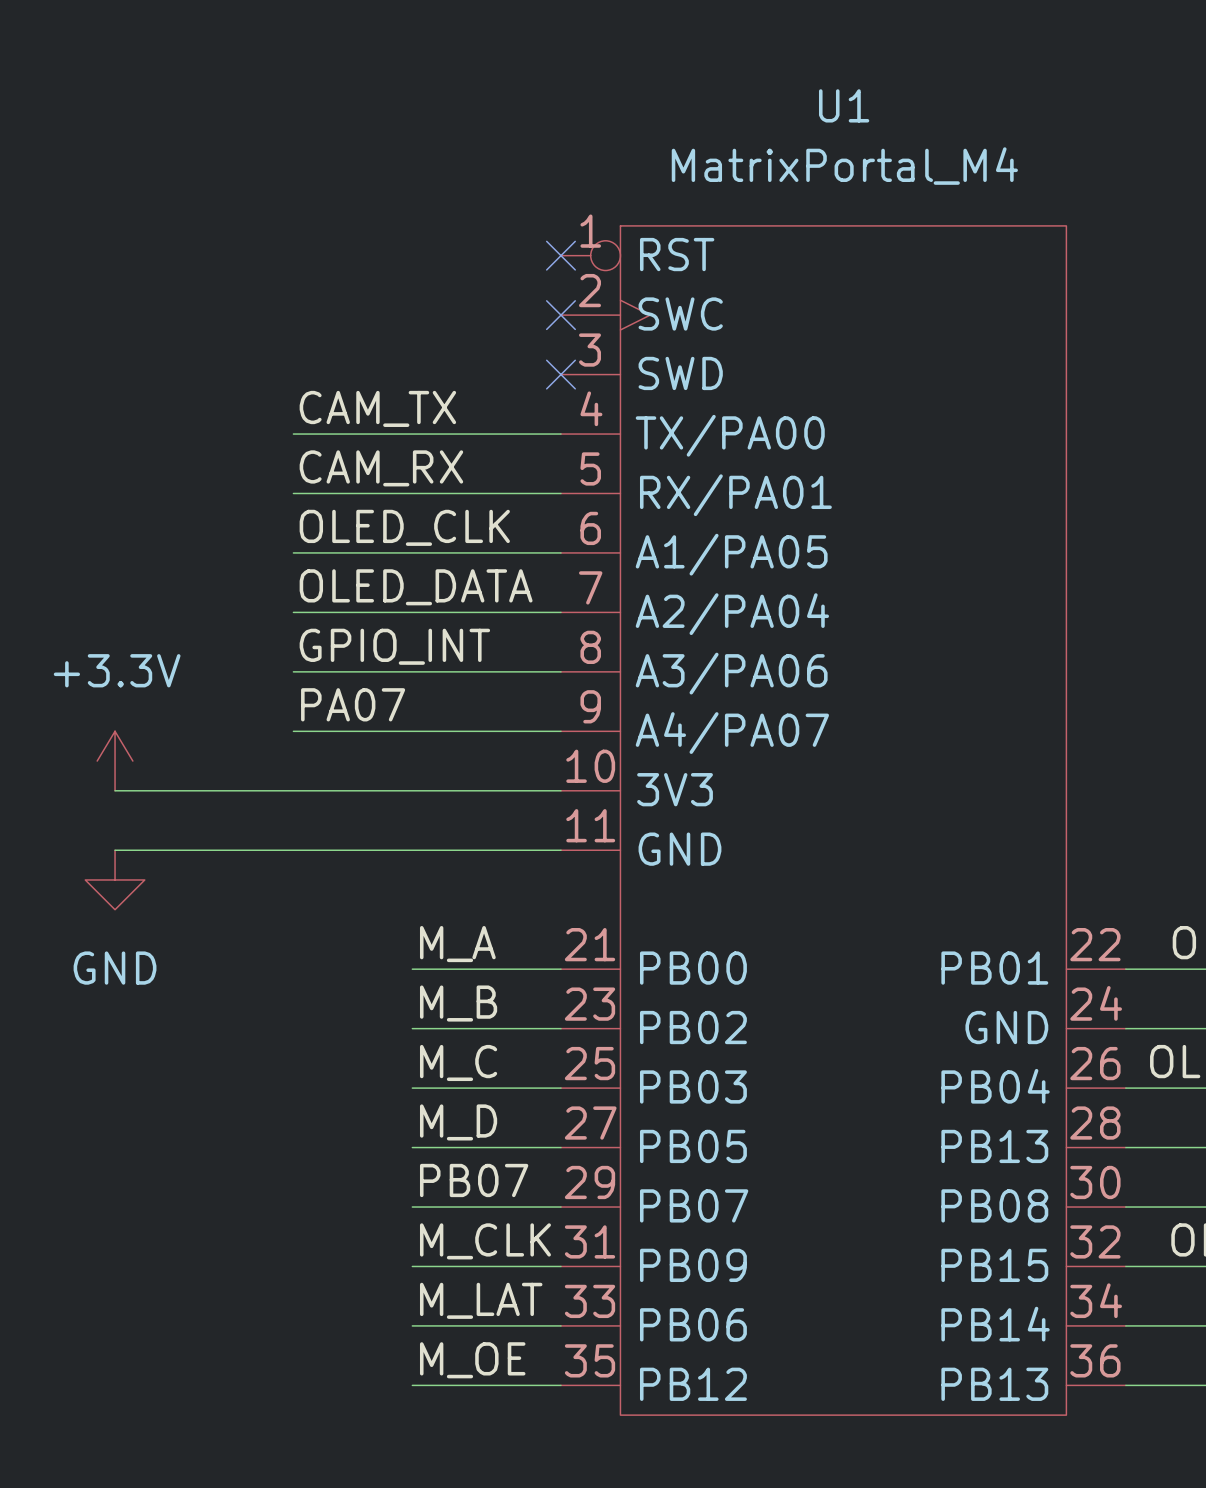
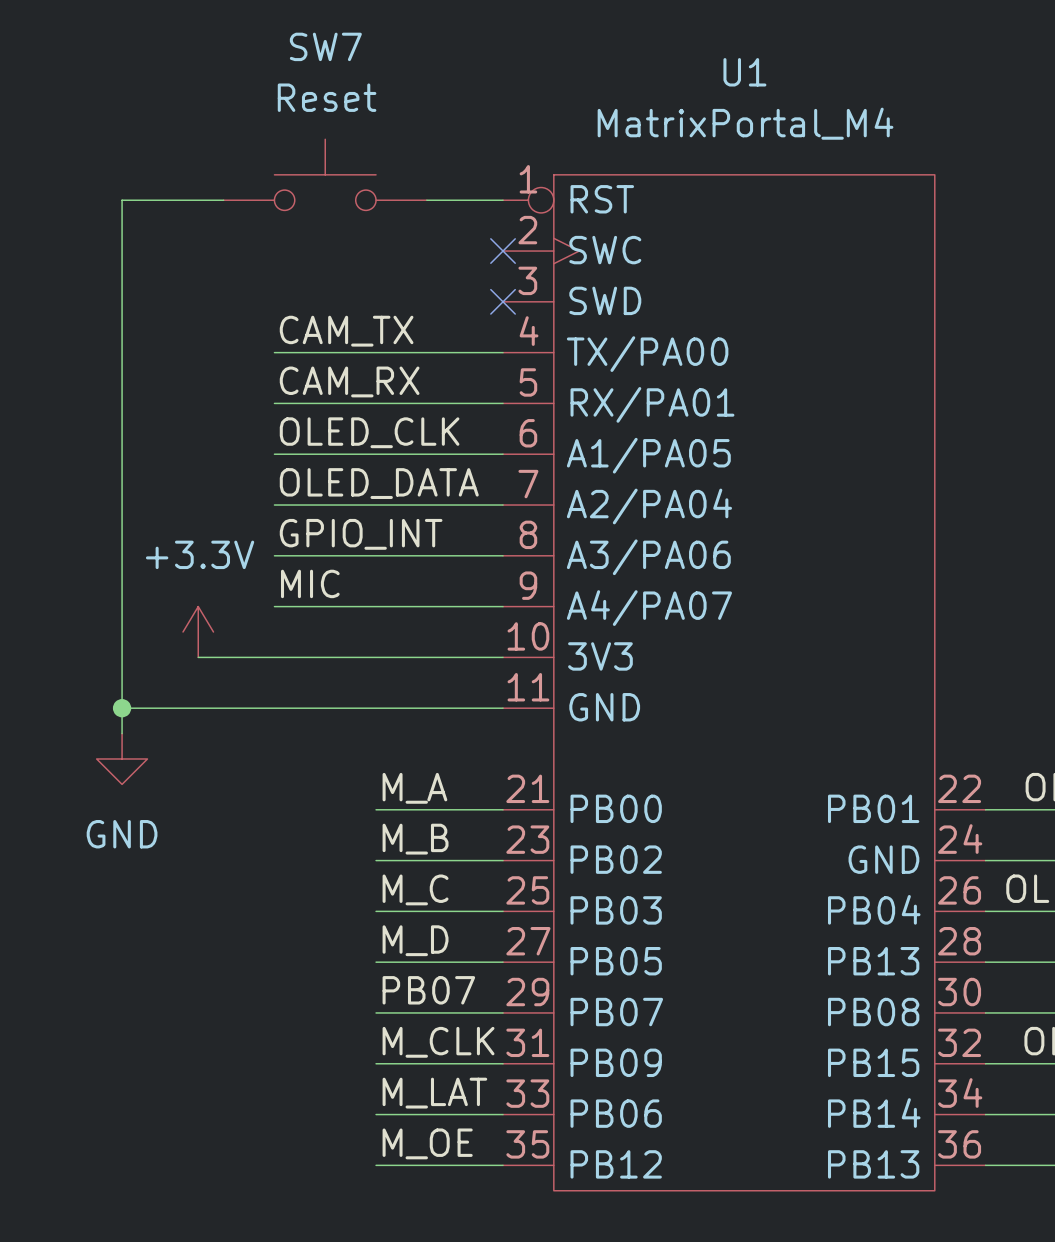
SW7: none -> Reset (325, 174)
wire: none -> (223, 200) (122, 200) (122, 733)
wire: none -> (426, 200) (503, 200)
no-connect mark: (560, 255) -> none
label: PA07 (353, 704) -> MIC (310, 583)
power symbol position: +3.3V (115, 761) -> +3.3V (198, 632)
wire: (115, 790) (204, 790) -> none
junction: none -> (122, 708)
power symbol position: GND (115, 879) -> GND (122, 758)

